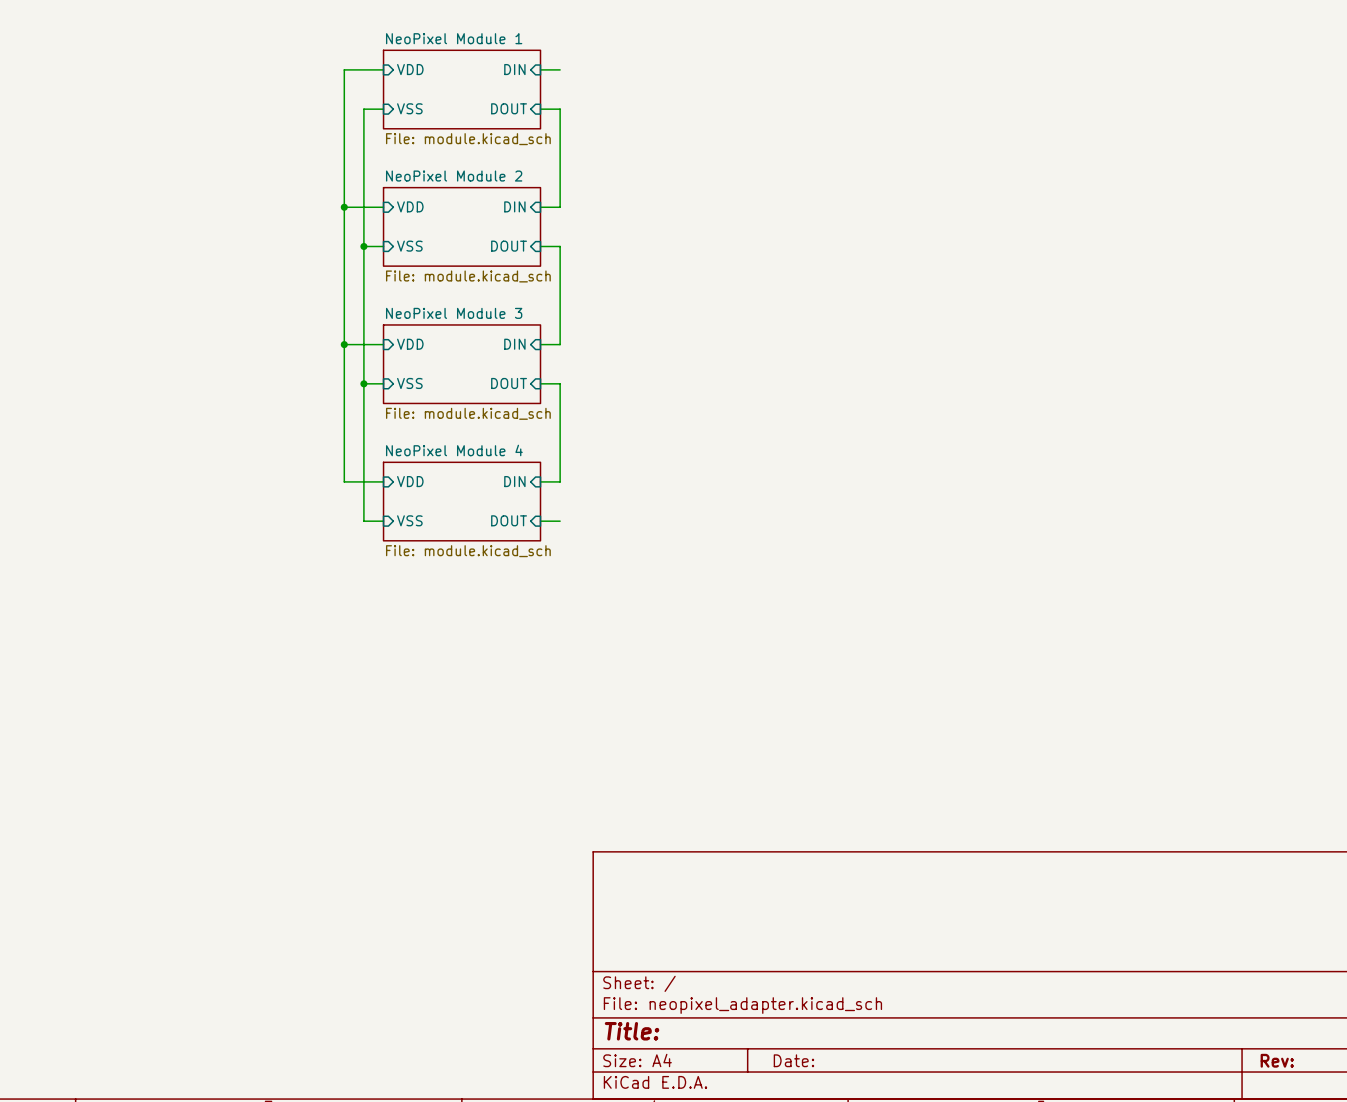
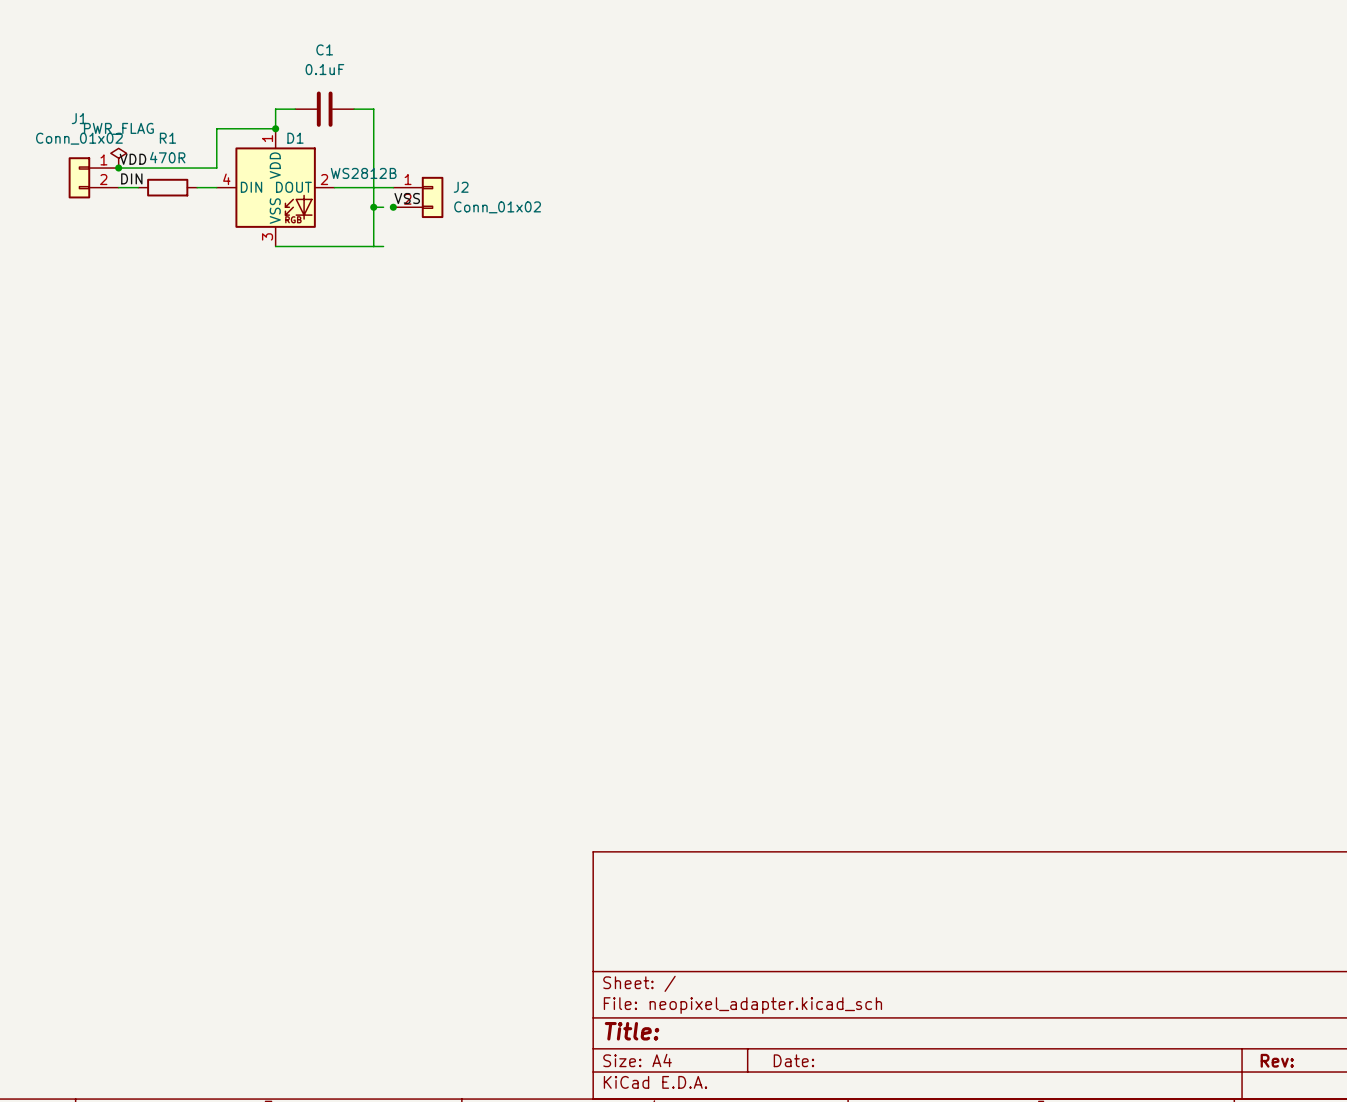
wire: (383, 69) (344, 69) (344, 481) (383, 481) -> none
sheet pin: VDD (410, 69) -> none
sheet pin: DIN (514, 69) -> none
wire: (540, 69) (560, 69) -> none
sheet NeoPixel Module 1: File: module.kicad_sch (462, 89) -> none
sheet pin: VSS (409, 108) -> none
sheet pin: DOUT (509, 108) -> none
wire: none -> (295, 109) (275, 109) (275, 128) (216, 128) (216, 168) (118, 168)
C1: none -> 0.1uF (324, 109)
wire: (363, 109) (363, 521) (383, 521) -> (363, 109) (354, 109)
wire: (373, 109) (383, 109) -> (373, 109) (373, 246)
wire: (540, 109) (560, 109) (560, 207) (540, 207) -> none
junction: none -> (275, 128)
power symbol: none -> PWR_FLAG (118, 158)
label: none -> VDD (132, 159)
junction: none -> (118, 168)
J1: none -> Conn_01x02 (93, 177)
label: none -> DIN (131, 178)
wire: none -> (118, 187) (138, 187)
R1: none -> 470R (167, 187)
wire: none -> (197, 187) (216, 187)
D1: none -> WS2812B (275, 187)
wire: none -> (334, 187) (393, 187)
J2: none -> Conn_01x02 (418, 197)
label: none -> VSS (407, 198)
sheet pin: VDD (410, 206) -> none
sheet pin: DIN (514, 206) -> none
wire: (344, 207) (373, 207) -> none
junction: (344, 207) -> none
junction: none -> (373, 207)
junction: none -> (393, 207)
sheet NeoPixel Module 2: File: module.kicad_sch (462, 226) -> none
wire: none -> (275, 246) (363, 246)
junction: (363, 246) -> none
sheet pin: VSS (409, 246) -> none
sheet pin: DOUT (509, 246) -> none
wire: (540, 246) (560, 246) (560, 344) (540, 344) -> none
wire: (344, 344) (383, 344) -> none
junction: (344, 344) -> none
sheet pin: VDD (410, 344) -> none
sheet pin: DIN (514, 344) -> none
sheet NeoPixel Module 3: File: module.kicad_sch (462, 364) -> none
wire: (363, 383) (383, 383) -> none
junction: (363, 383) -> none
sheet pin: VSS (409, 383) -> none
sheet pin: DOUT (509, 383) -> none
wire: (540, 383) (560, 383) (560, 481) (540, 481) -> none
sheet pin: VDD (410, 481) -> none
sheet pin: DIN (514, 481) -> none
sheet NeoPixel Module 4: File: module.kicad_sch (462, 501) -> none
sheet pin: VSS (409, 520) -> none
sheet pin: DOUT (509, 520) -> none
wire: (540, 521) (560, 521) -> none

